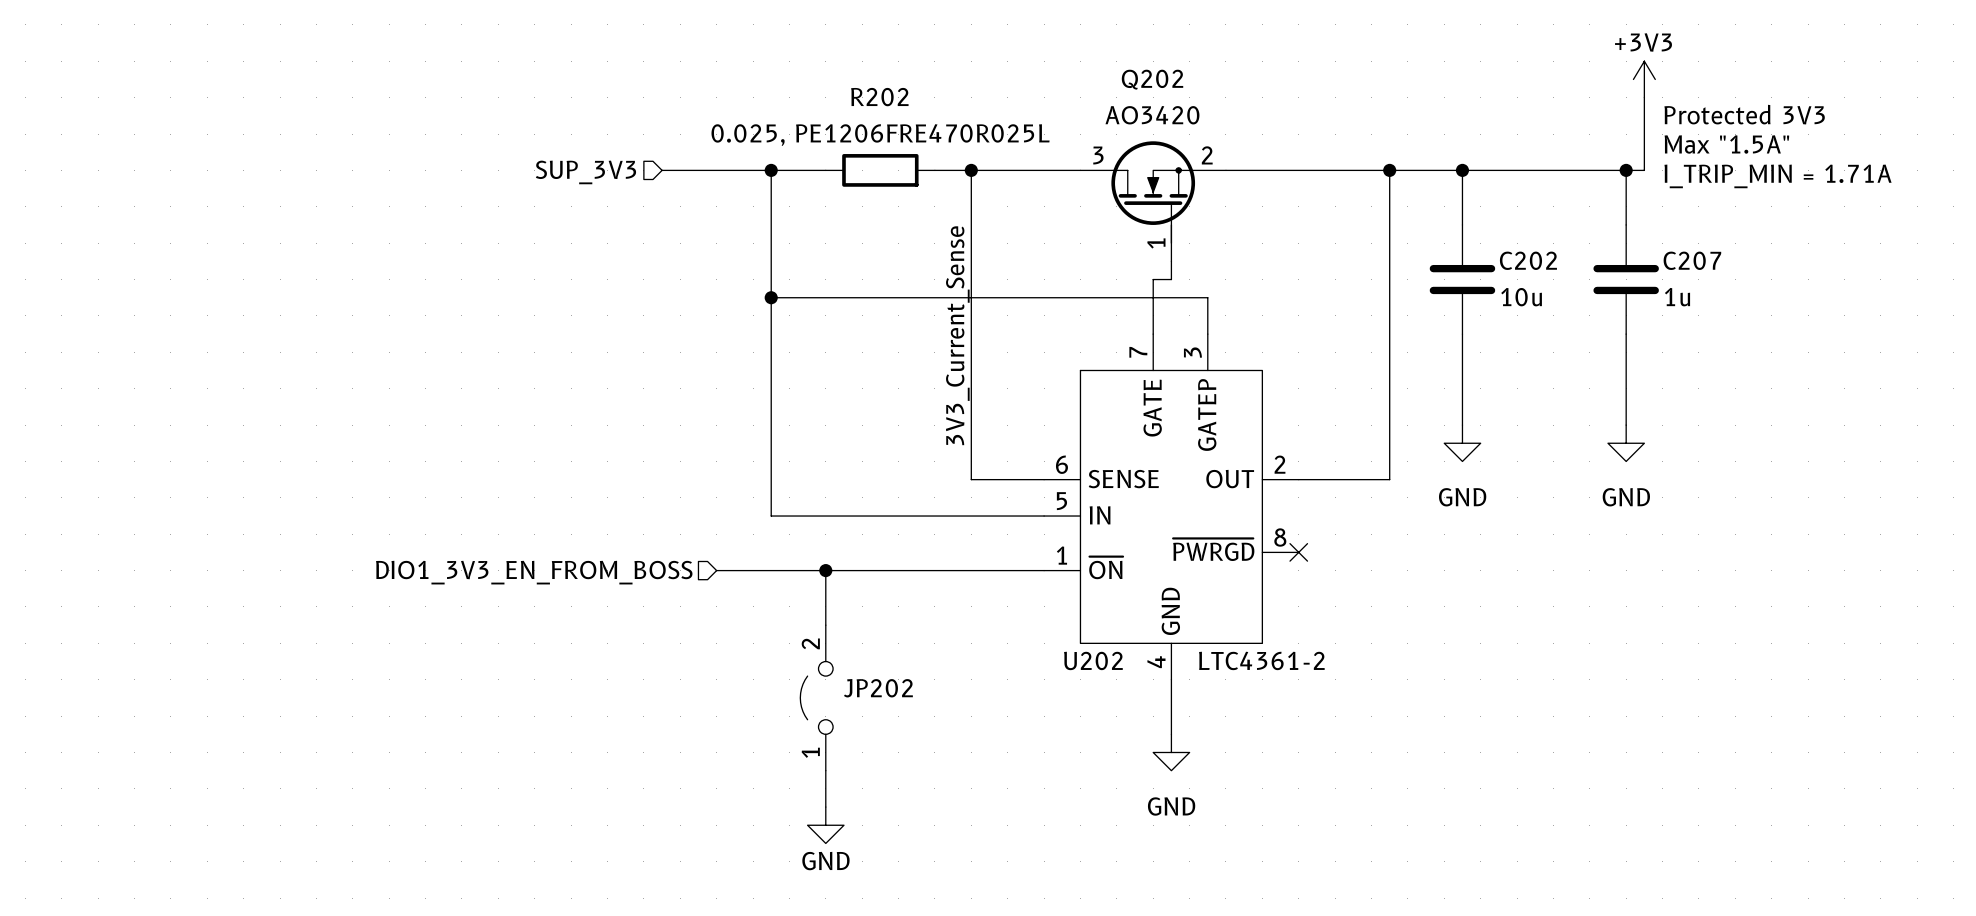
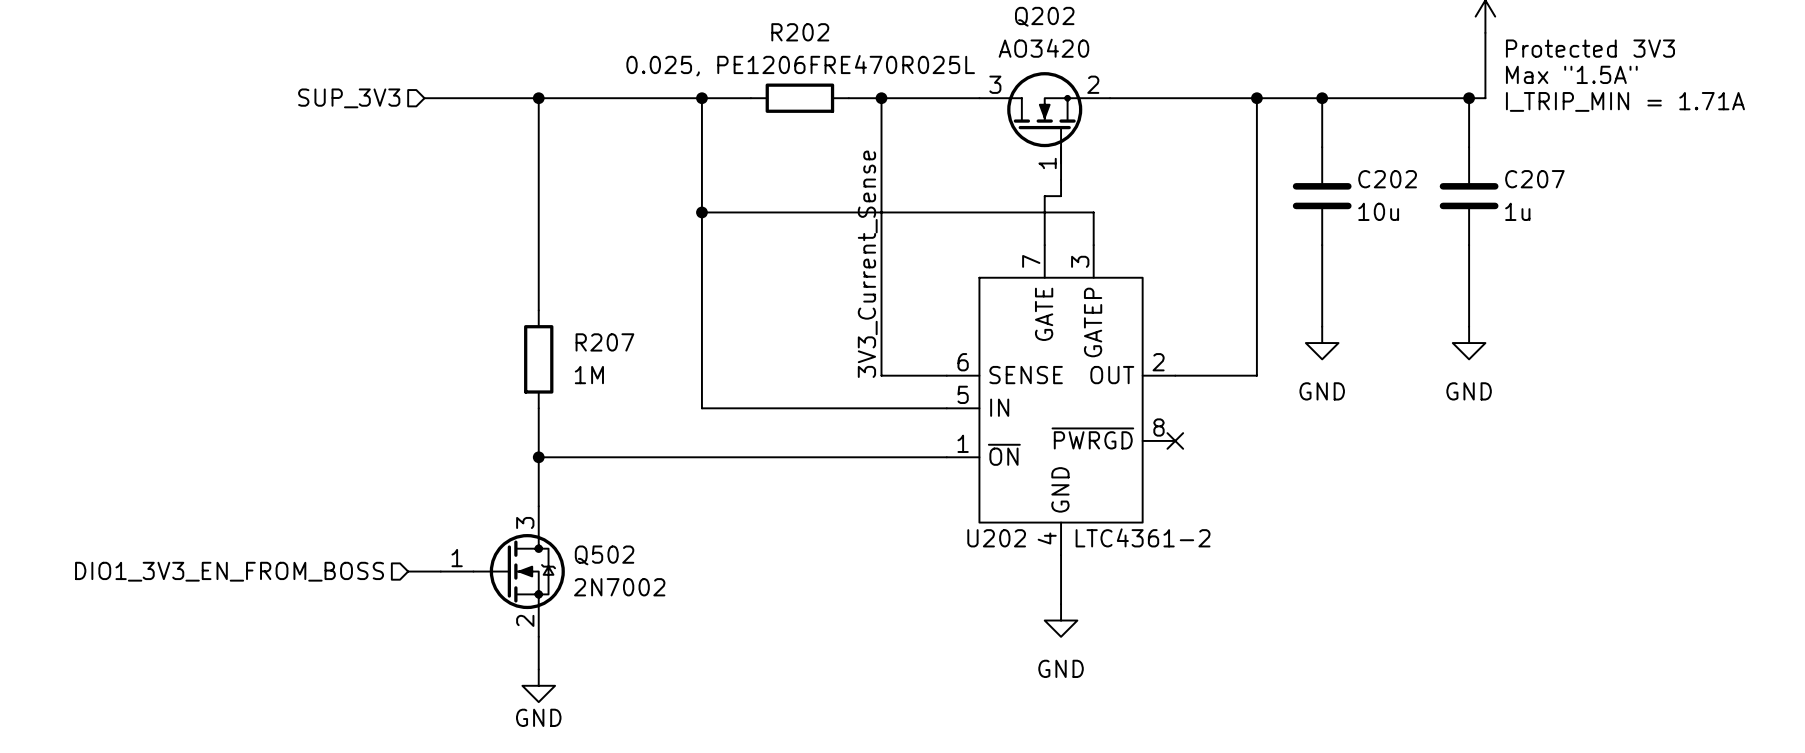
wire: none -> (424, 98) (604, 98)
wire: none -> (538, 98) (538, 310)
junction: none -> (538, 98)
hierarchical label position: SUP_3V3 (585, 172) -> SUP_3V3 (349, 98)
R207: none -> 1M (538, 359)
wire: none -> (538, 408) (538, 506)
wire: none -> (538, 457) (652, 457)
junction: none -> (538, 457)
wire: (825, 570) (825, 625) -> none
junction: (825, 570) -> none
hierarchical label position: DIO1_3V3_EN_FROM_BOSS (534, 572) -> DIO1_3V3_EN_FROM_BOSS (229, 571)
wire: none -> (408, 571) (440, 571)
Q502: none -> 2N7002 (502, 571)
JP202: (816, 697) -> none
wire: (825, 770) (825, 807) -> (538, 636) (538, 669)
power symbol position: GND (825, 825) -> GND (538, 685)

